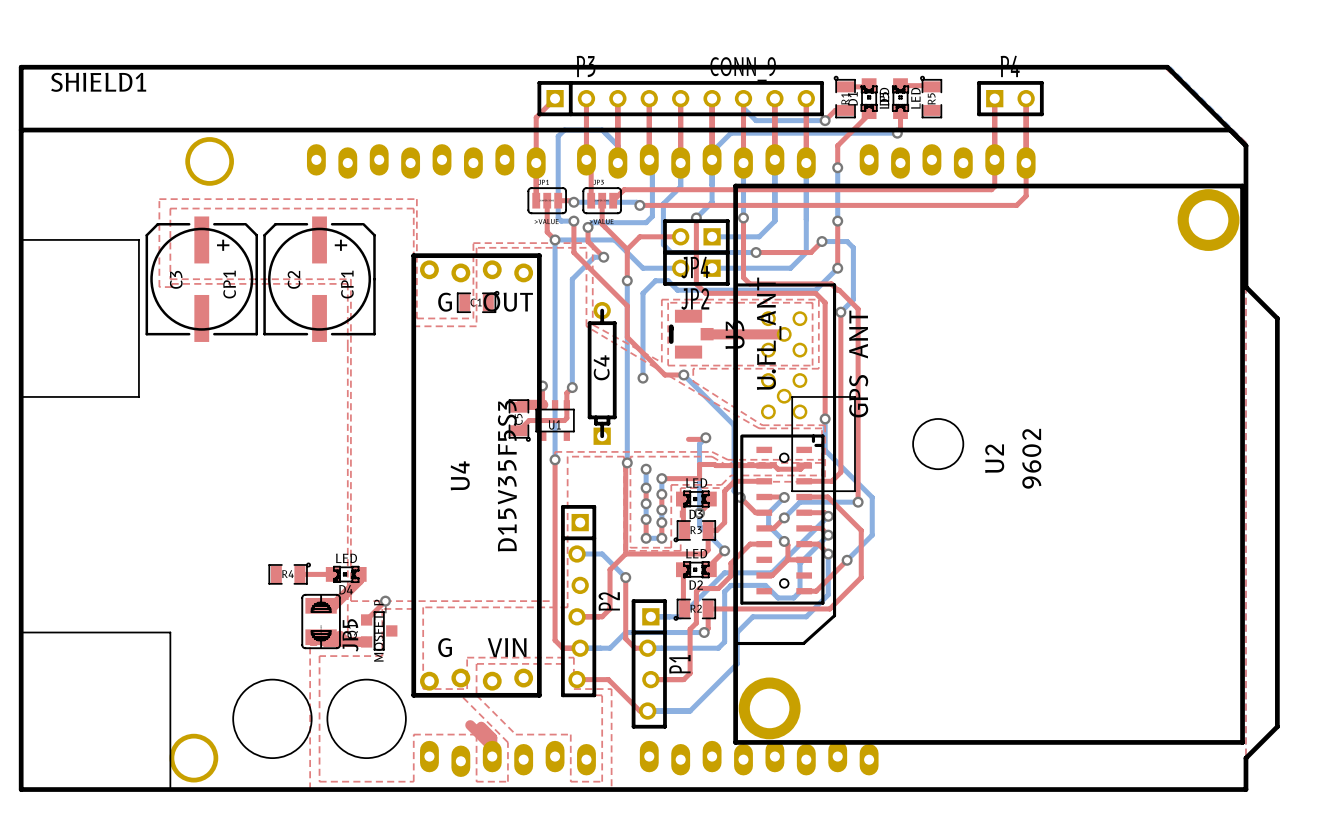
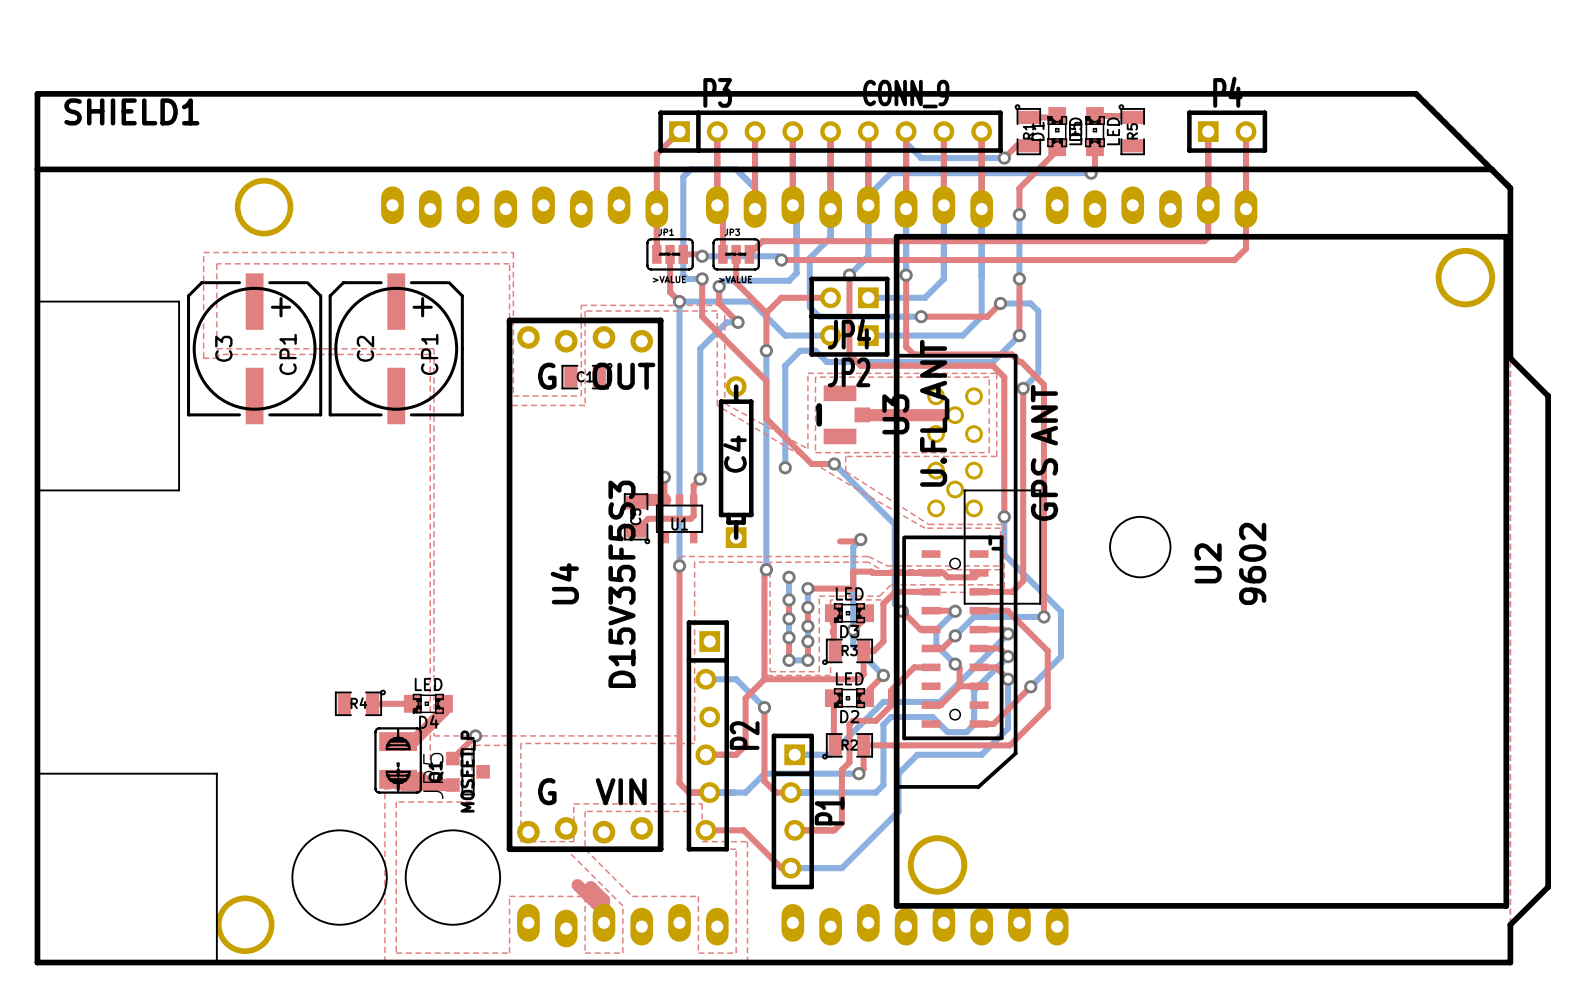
U2 footprint: [733, 183, 1245, 745] -> [893, 233, 1510, 909]

